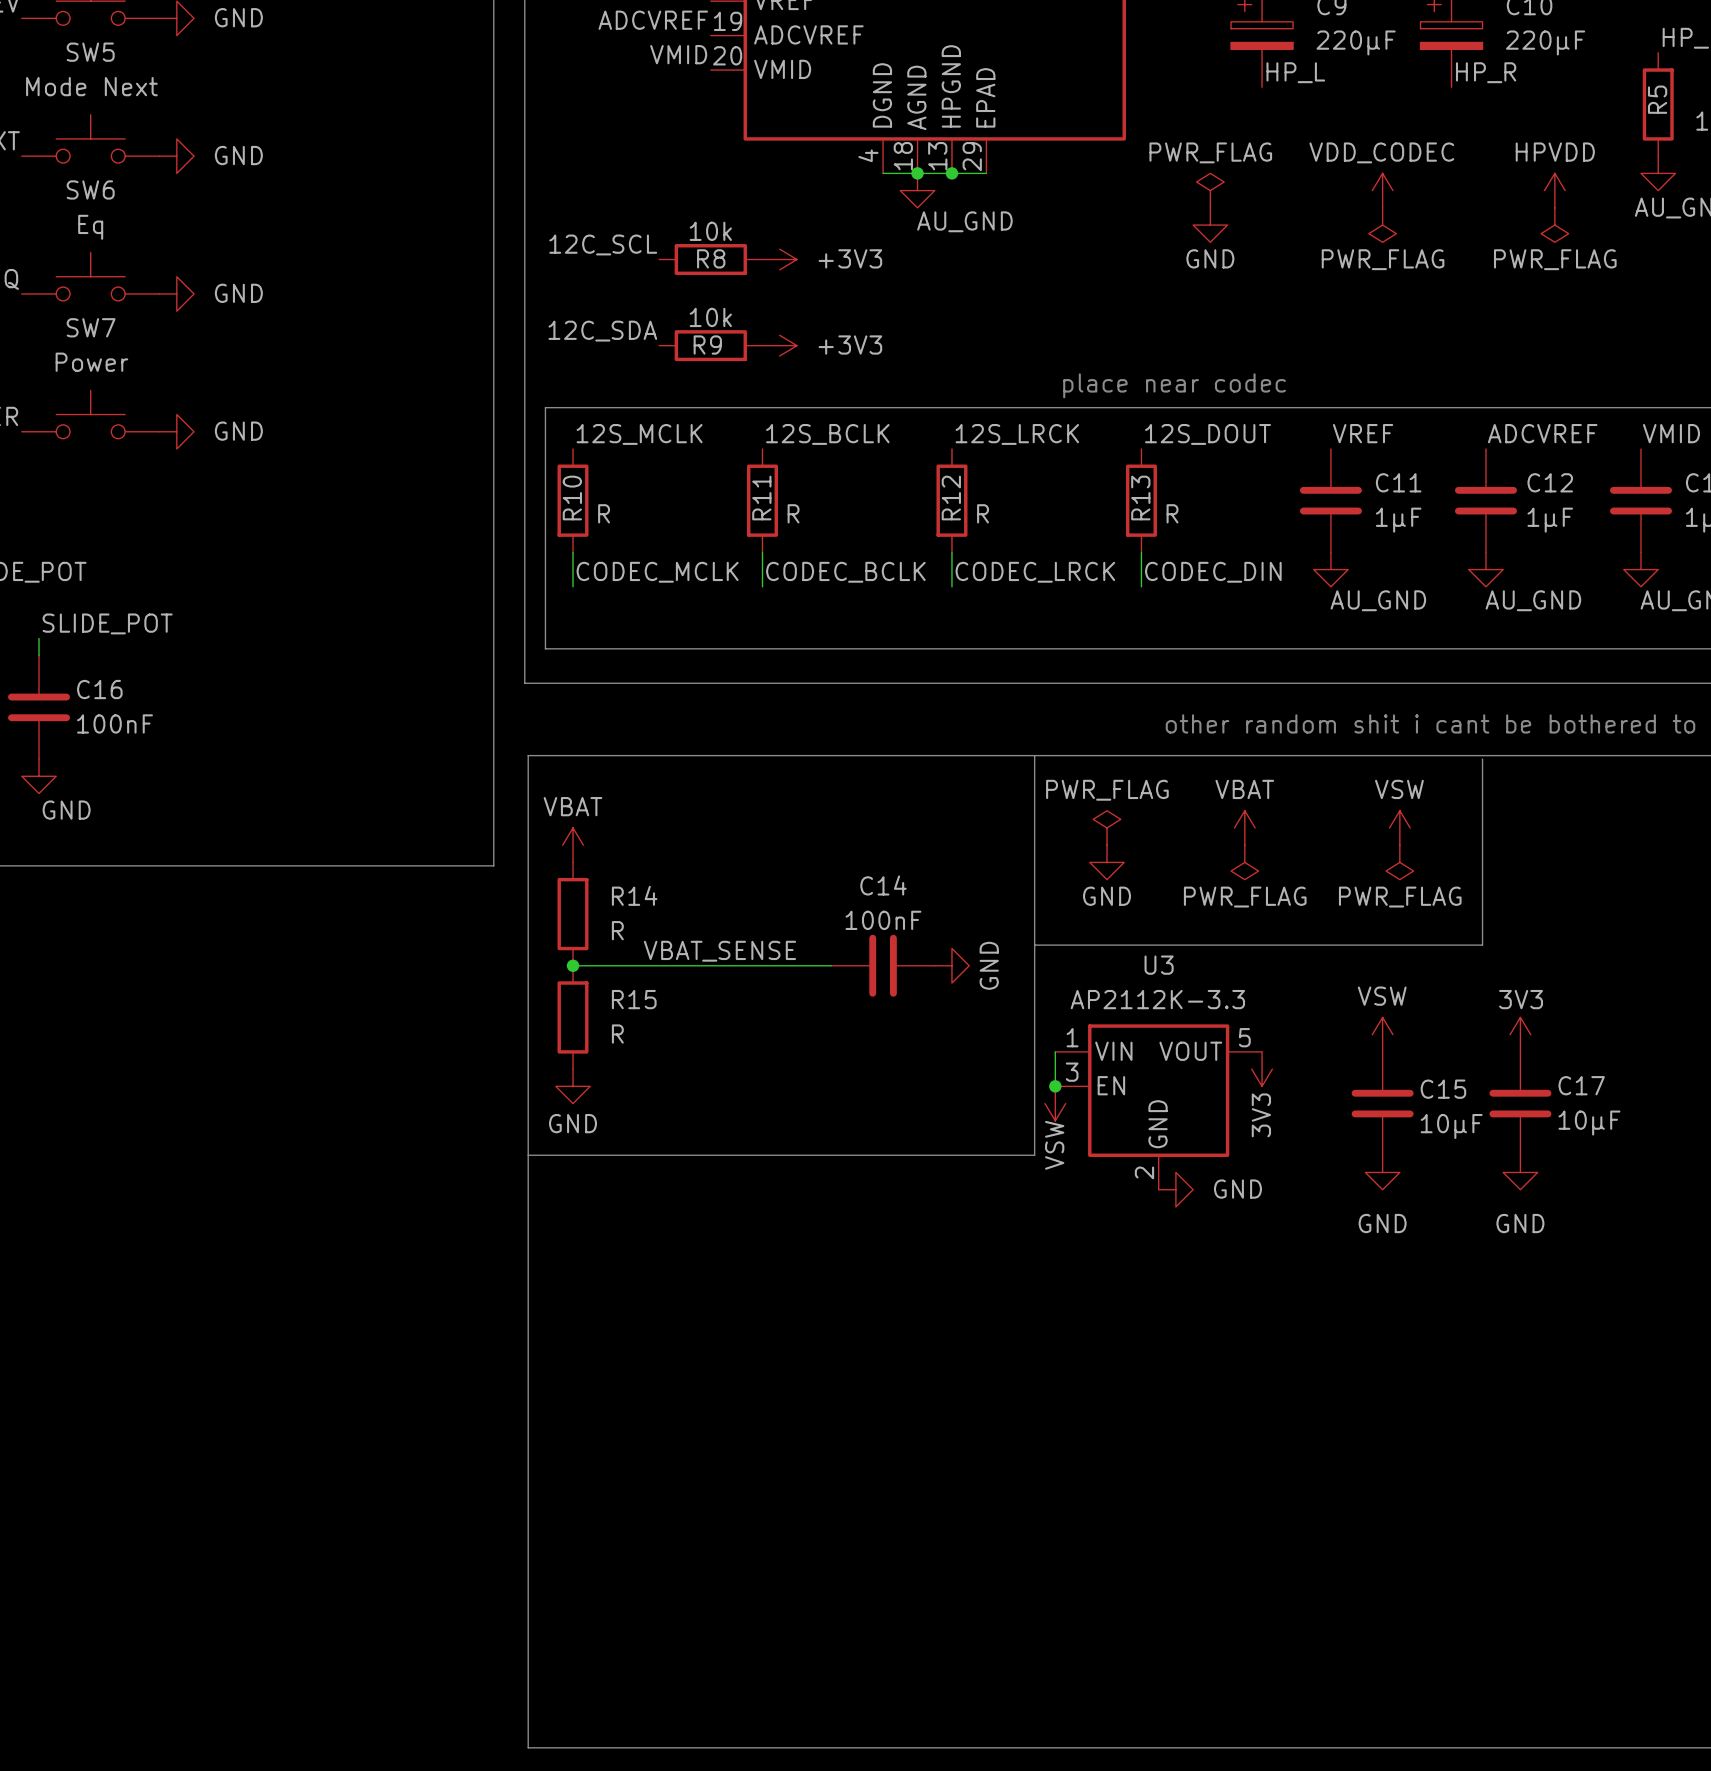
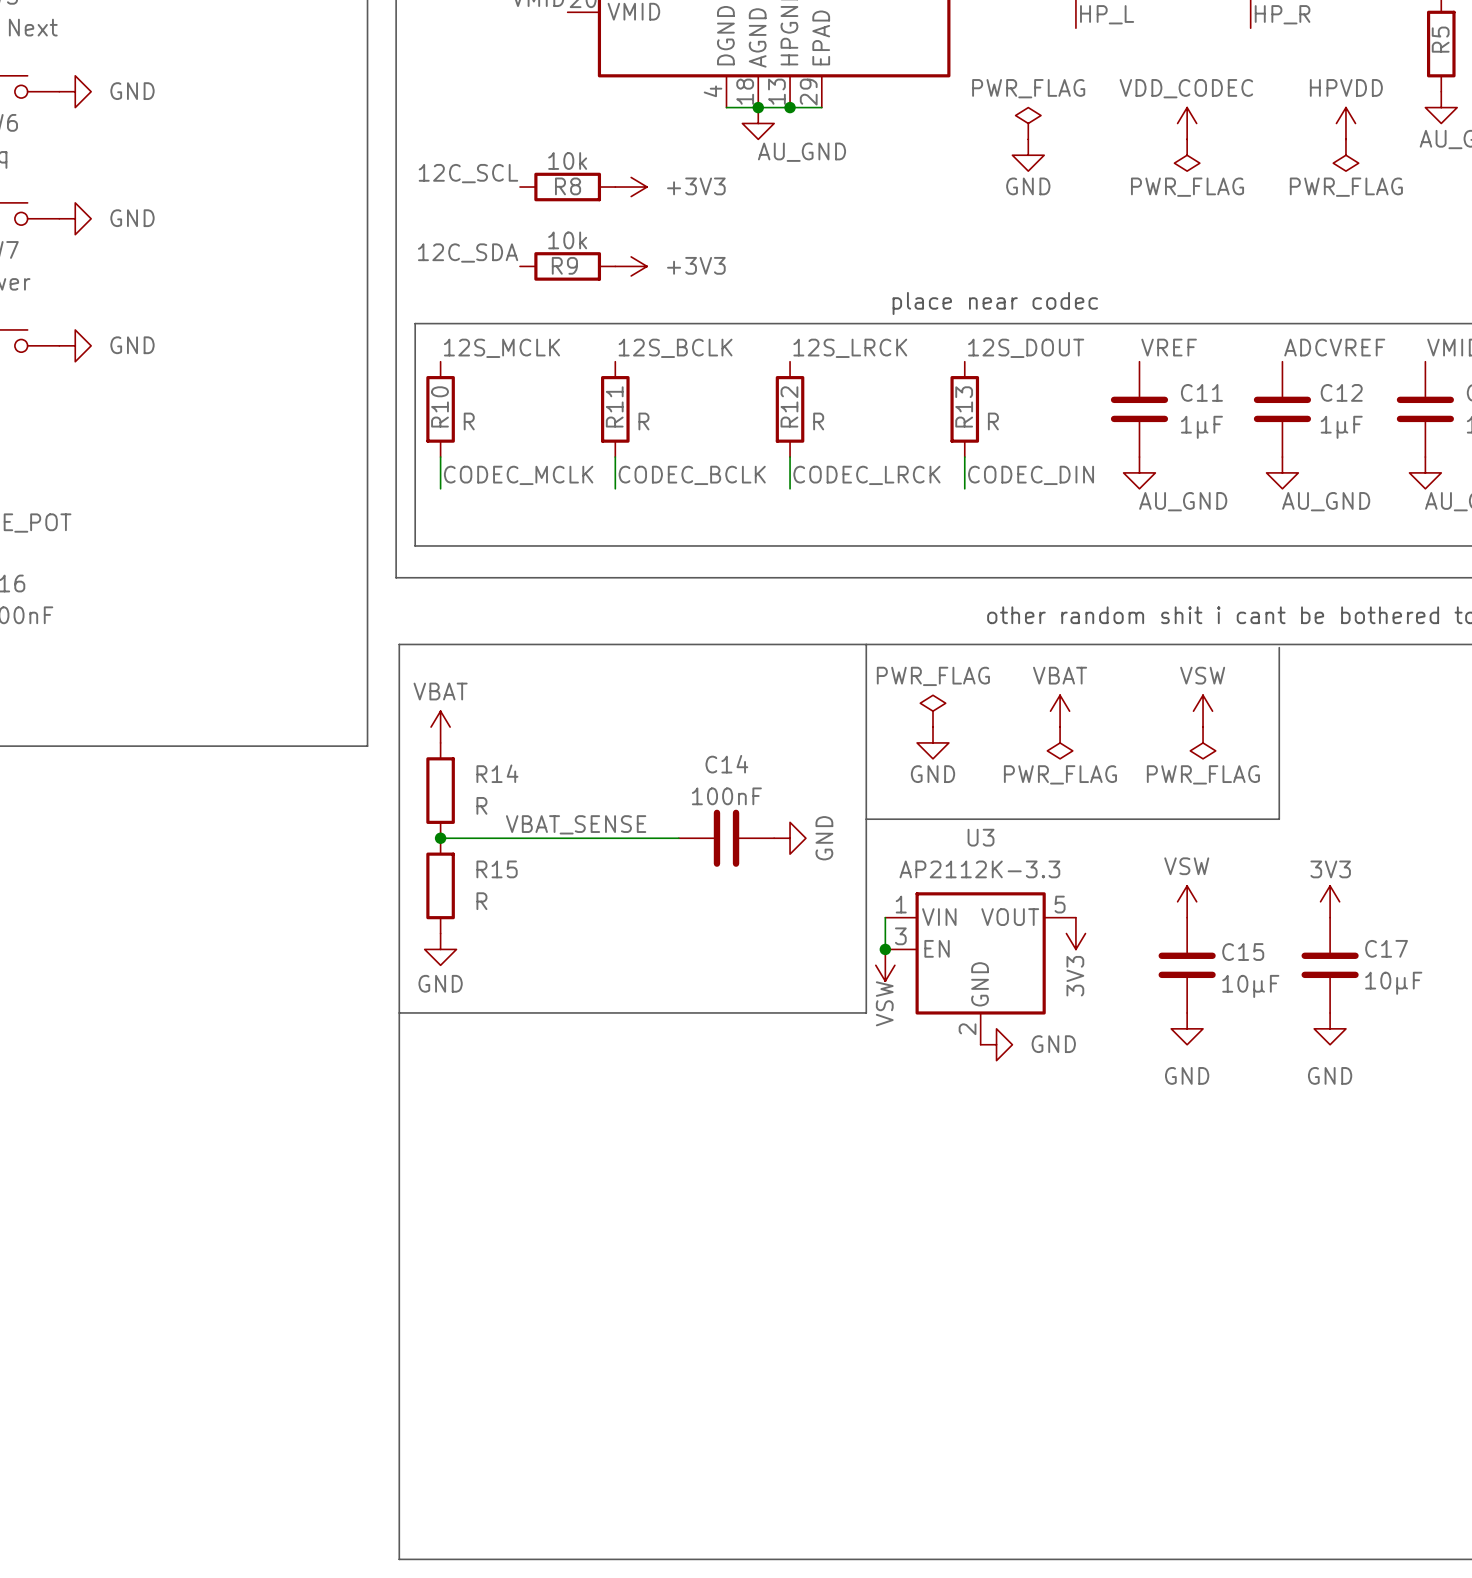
power symbol position: 3V3 (1520, 1034) -> 3V3 (1330, 901)
C17 position: (1520, 1103) -> (1330, 965)
power symbol position: GND (1520, 1172) -> GND (1330, 1028)

